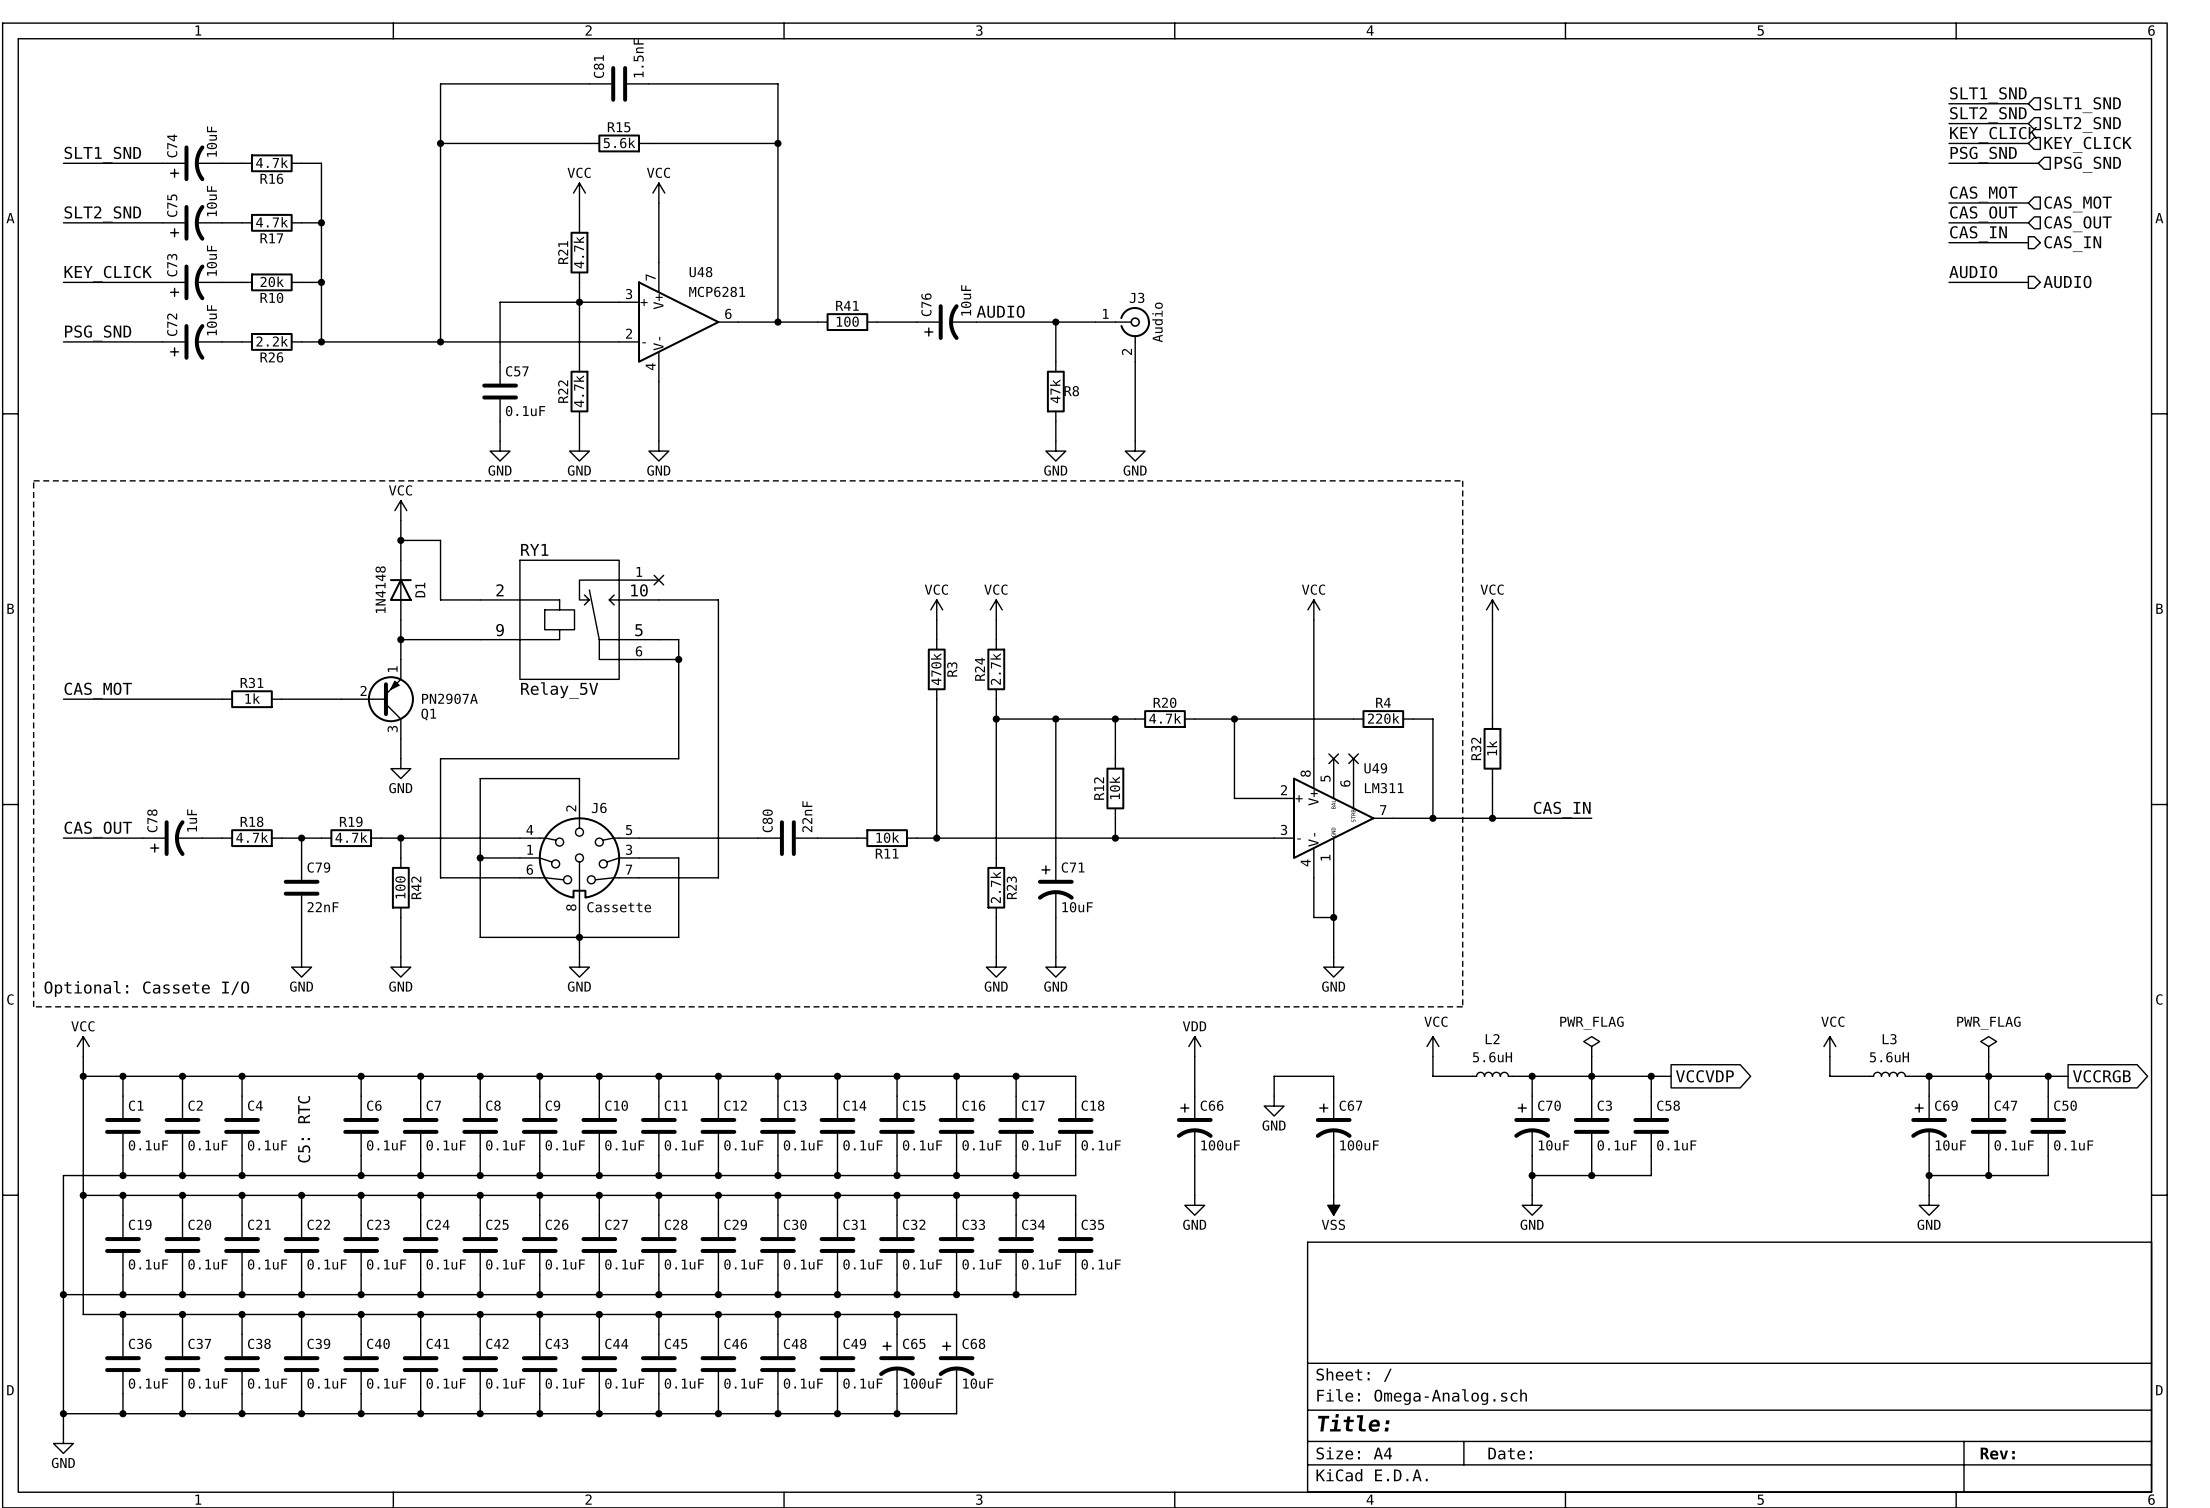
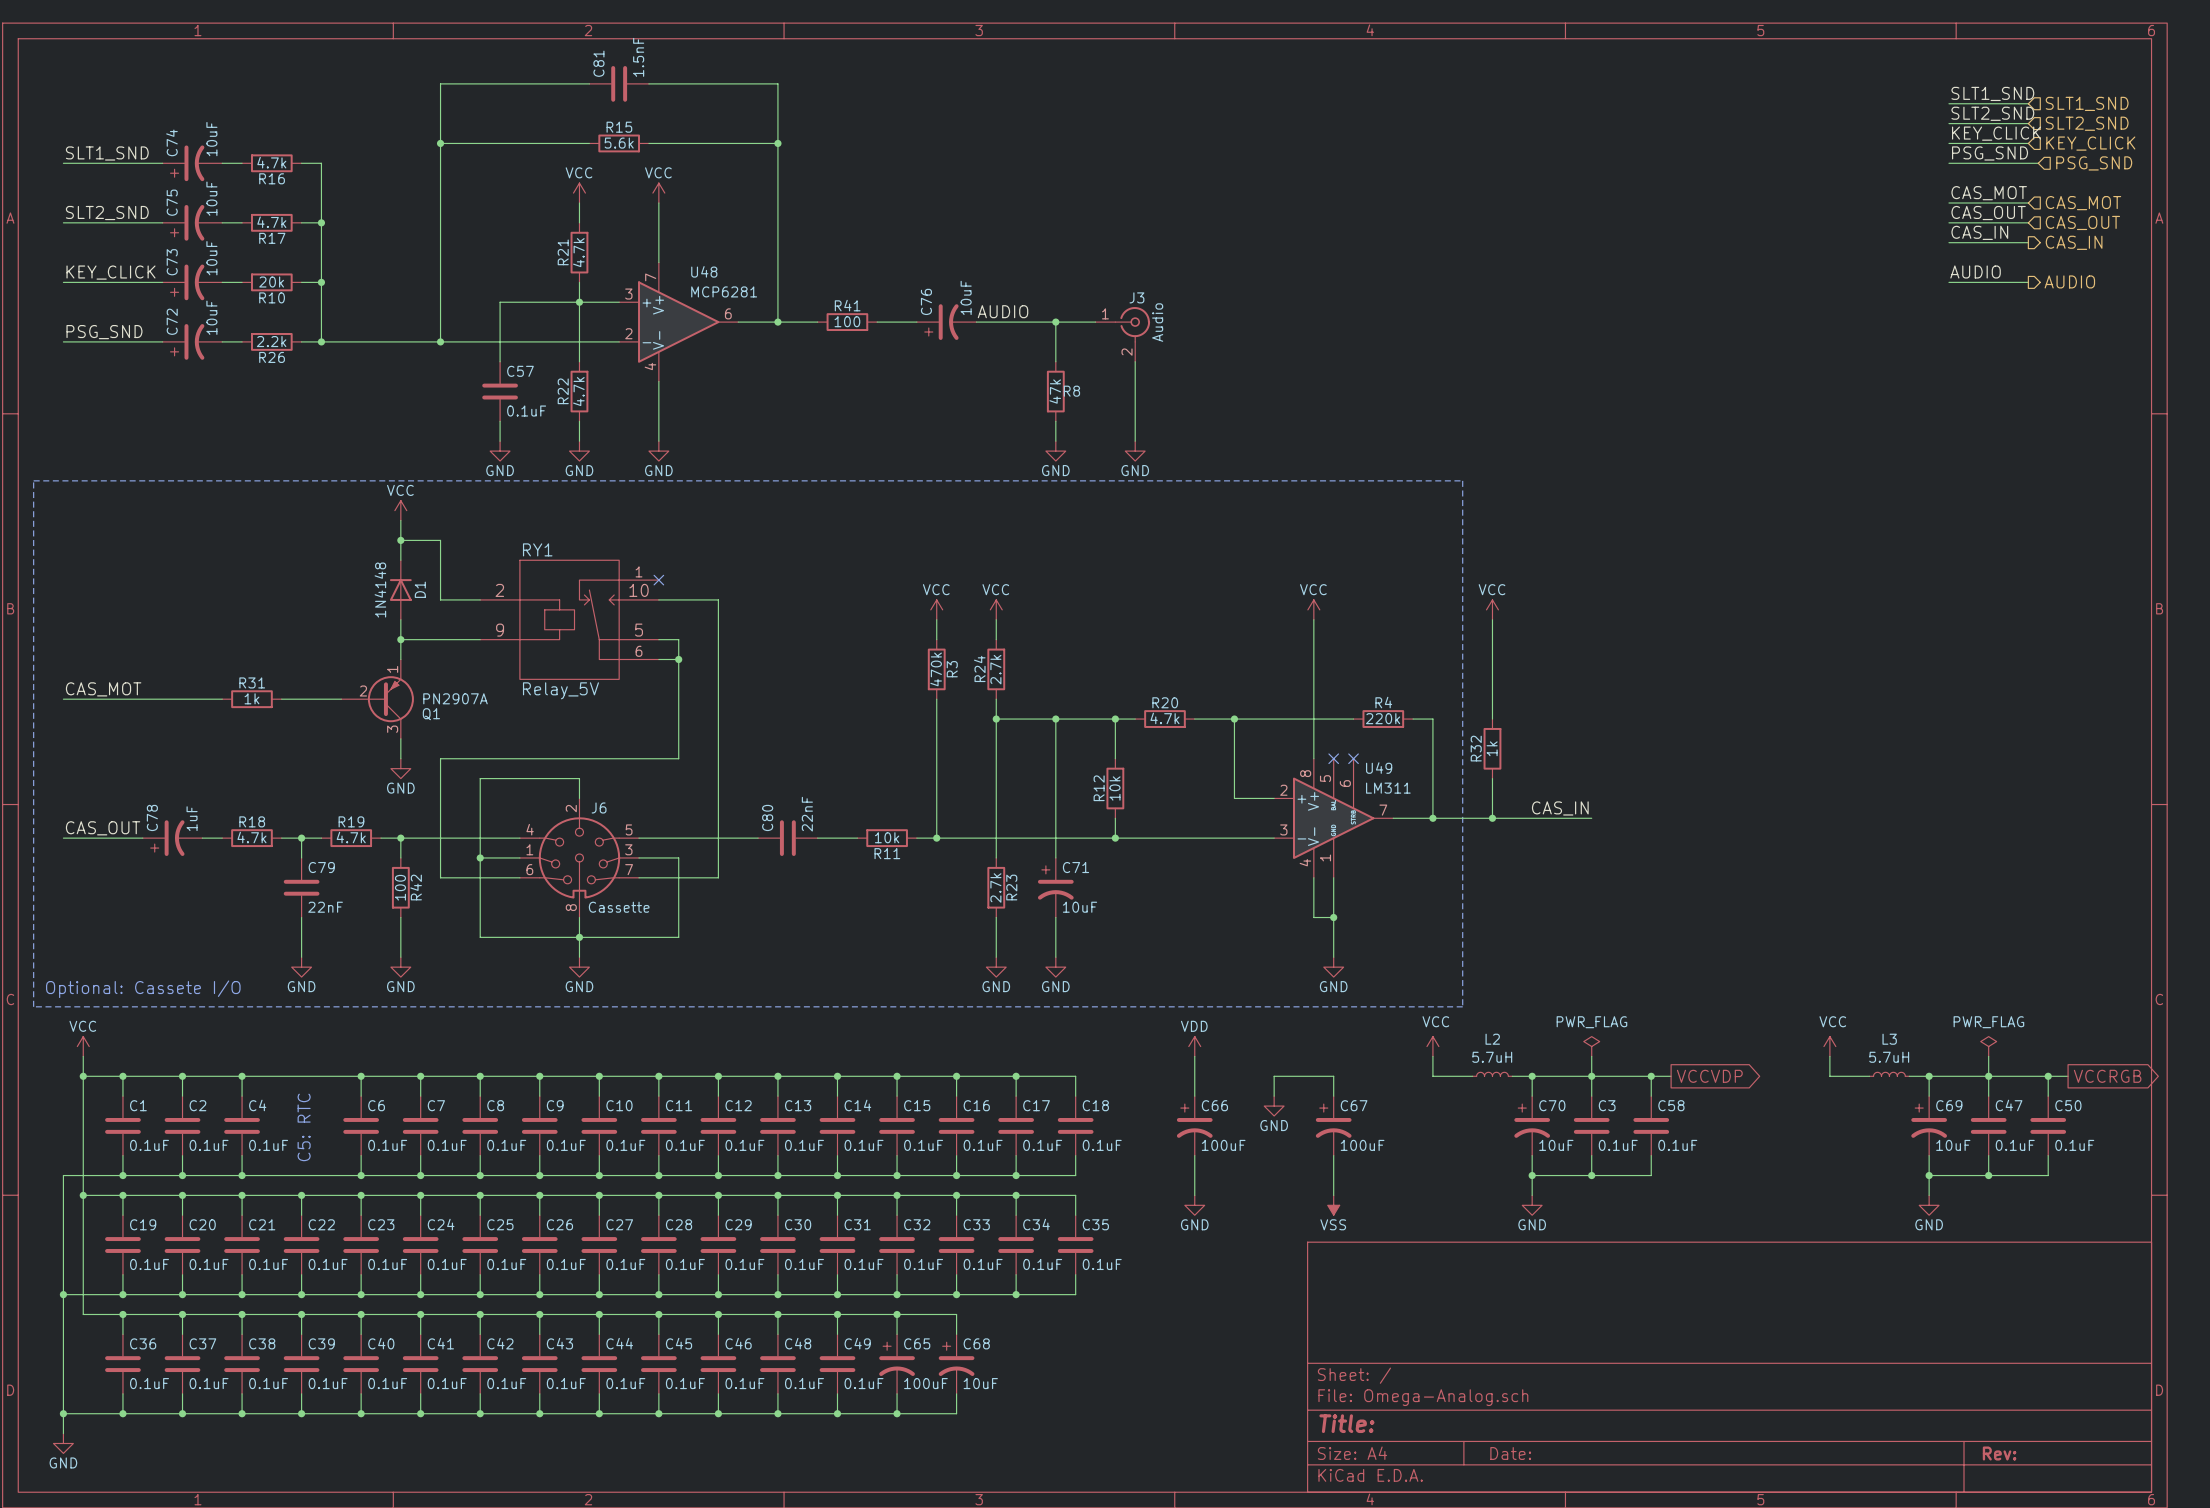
L2 value: 5.6uH (1492, 1057) -> 5.7uH (1492, 1057)
L3 value: 5.6uH (1889, 1057) -> 5.7uH (1889, 1057)

